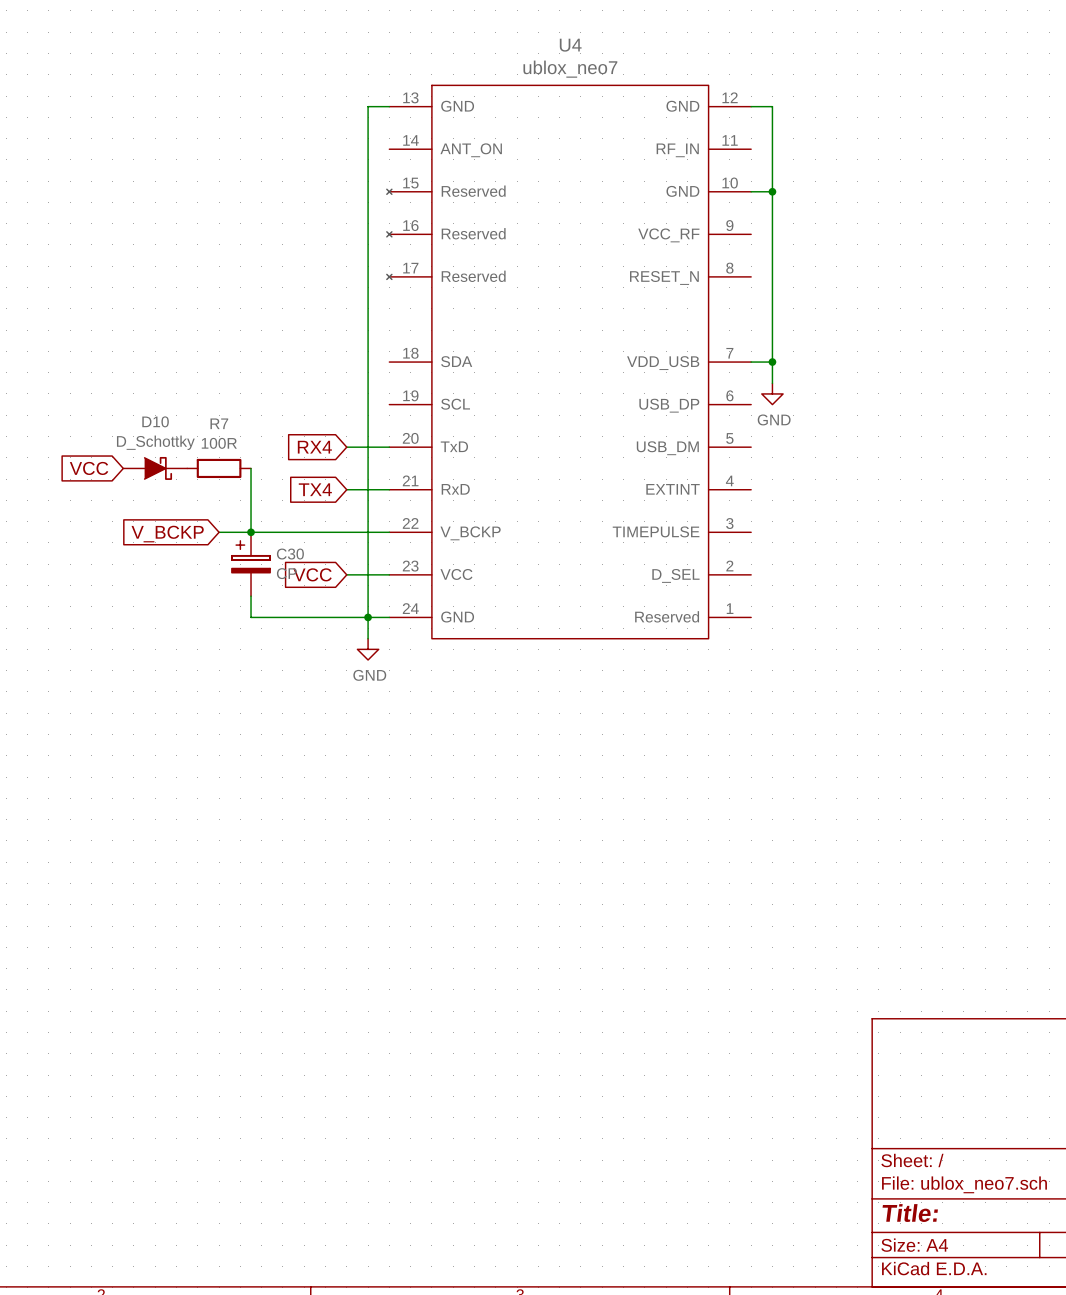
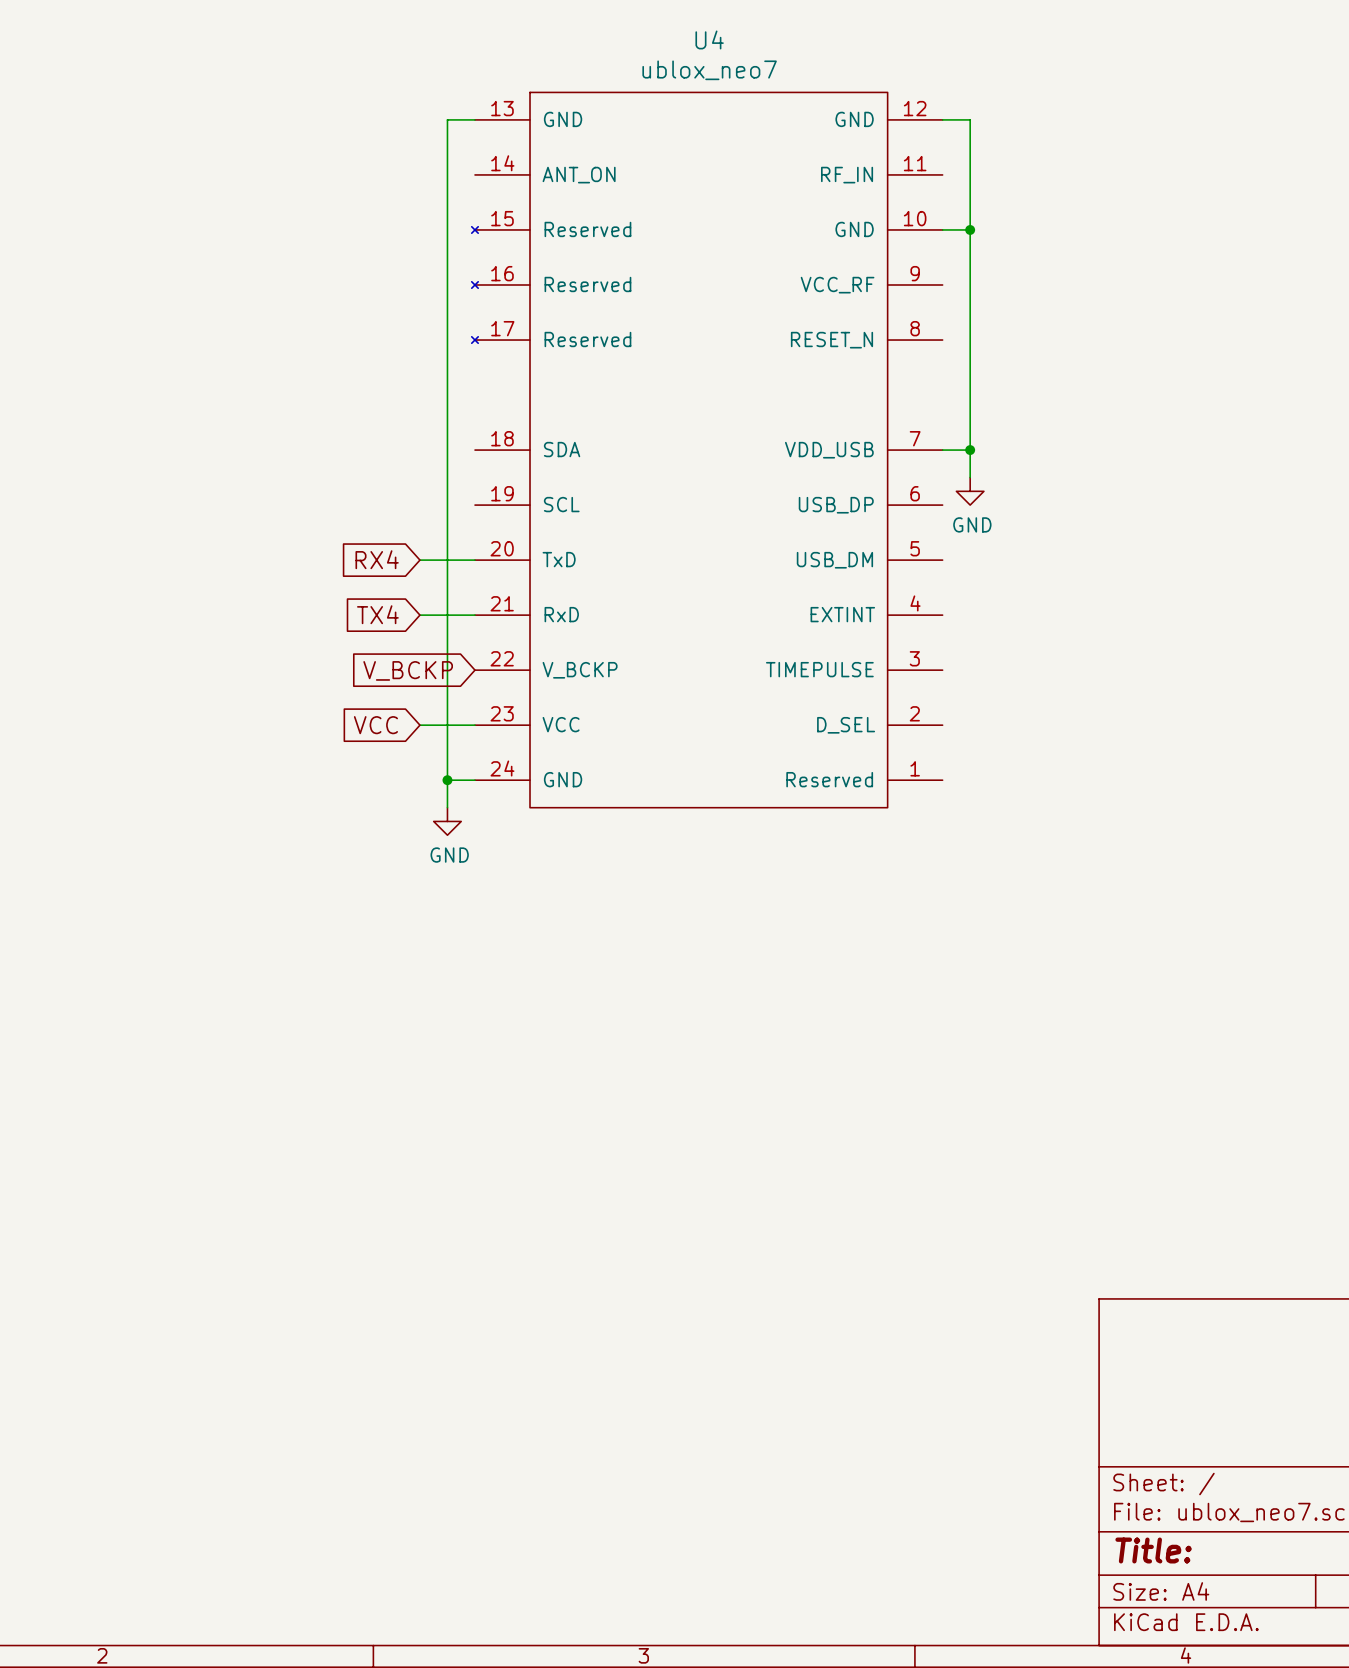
global label: VCC (89, 468) -> none
D10: D_Schottky (155, 468) -> none
R7: 100R (219, 468) -> none
wire: (251, 468) (251, 532) -> none
wire: (219, 532) (389, 532) -> none
junction: (251, 532) -> none
global label position: V_BCKP (167, 534) -> V_BCKP (408, 670)
C30: CP (251, 564) -> none
wire: (251, 596) (251, 617) (368, 617) -> none

